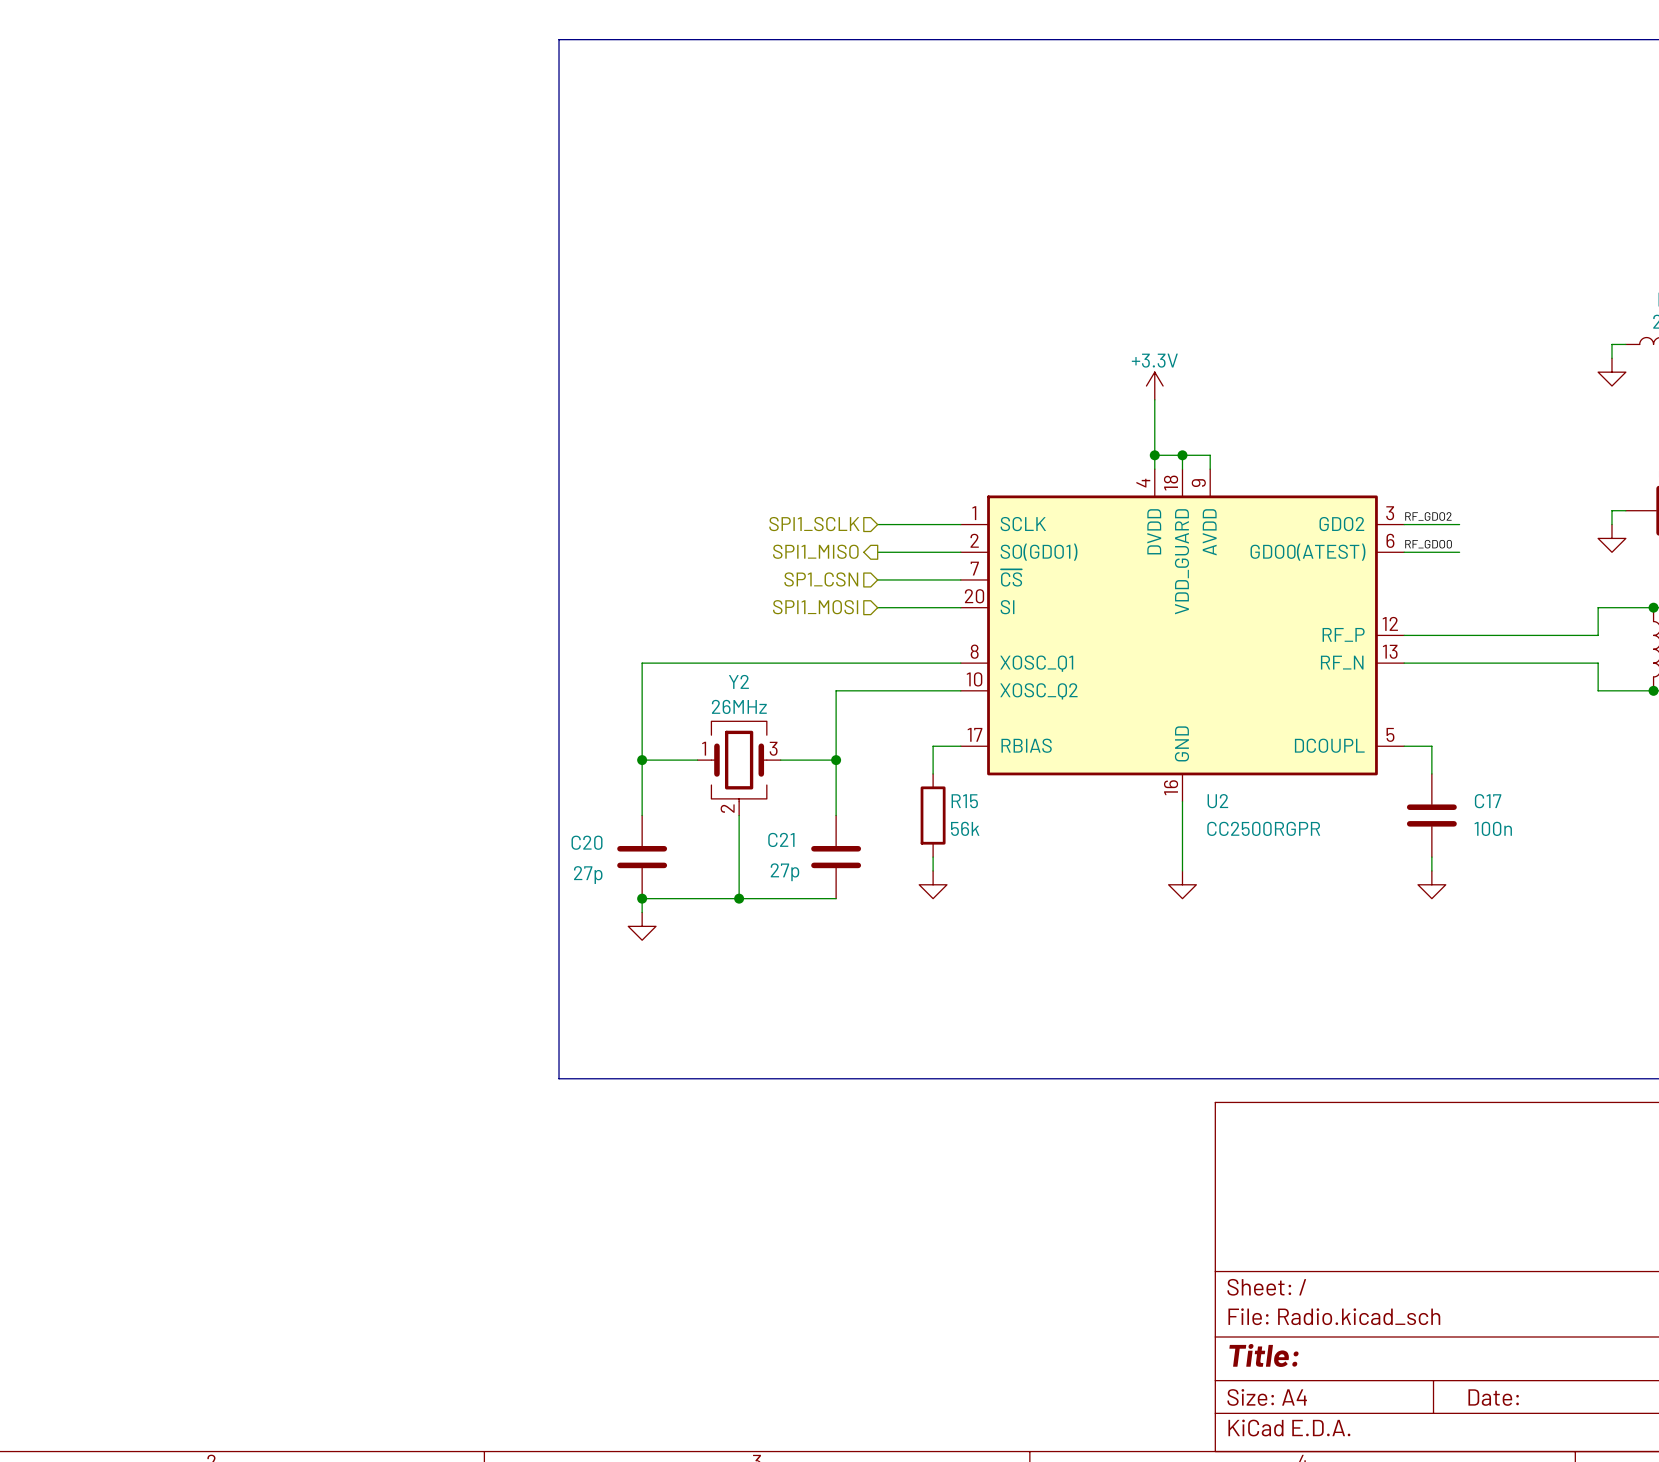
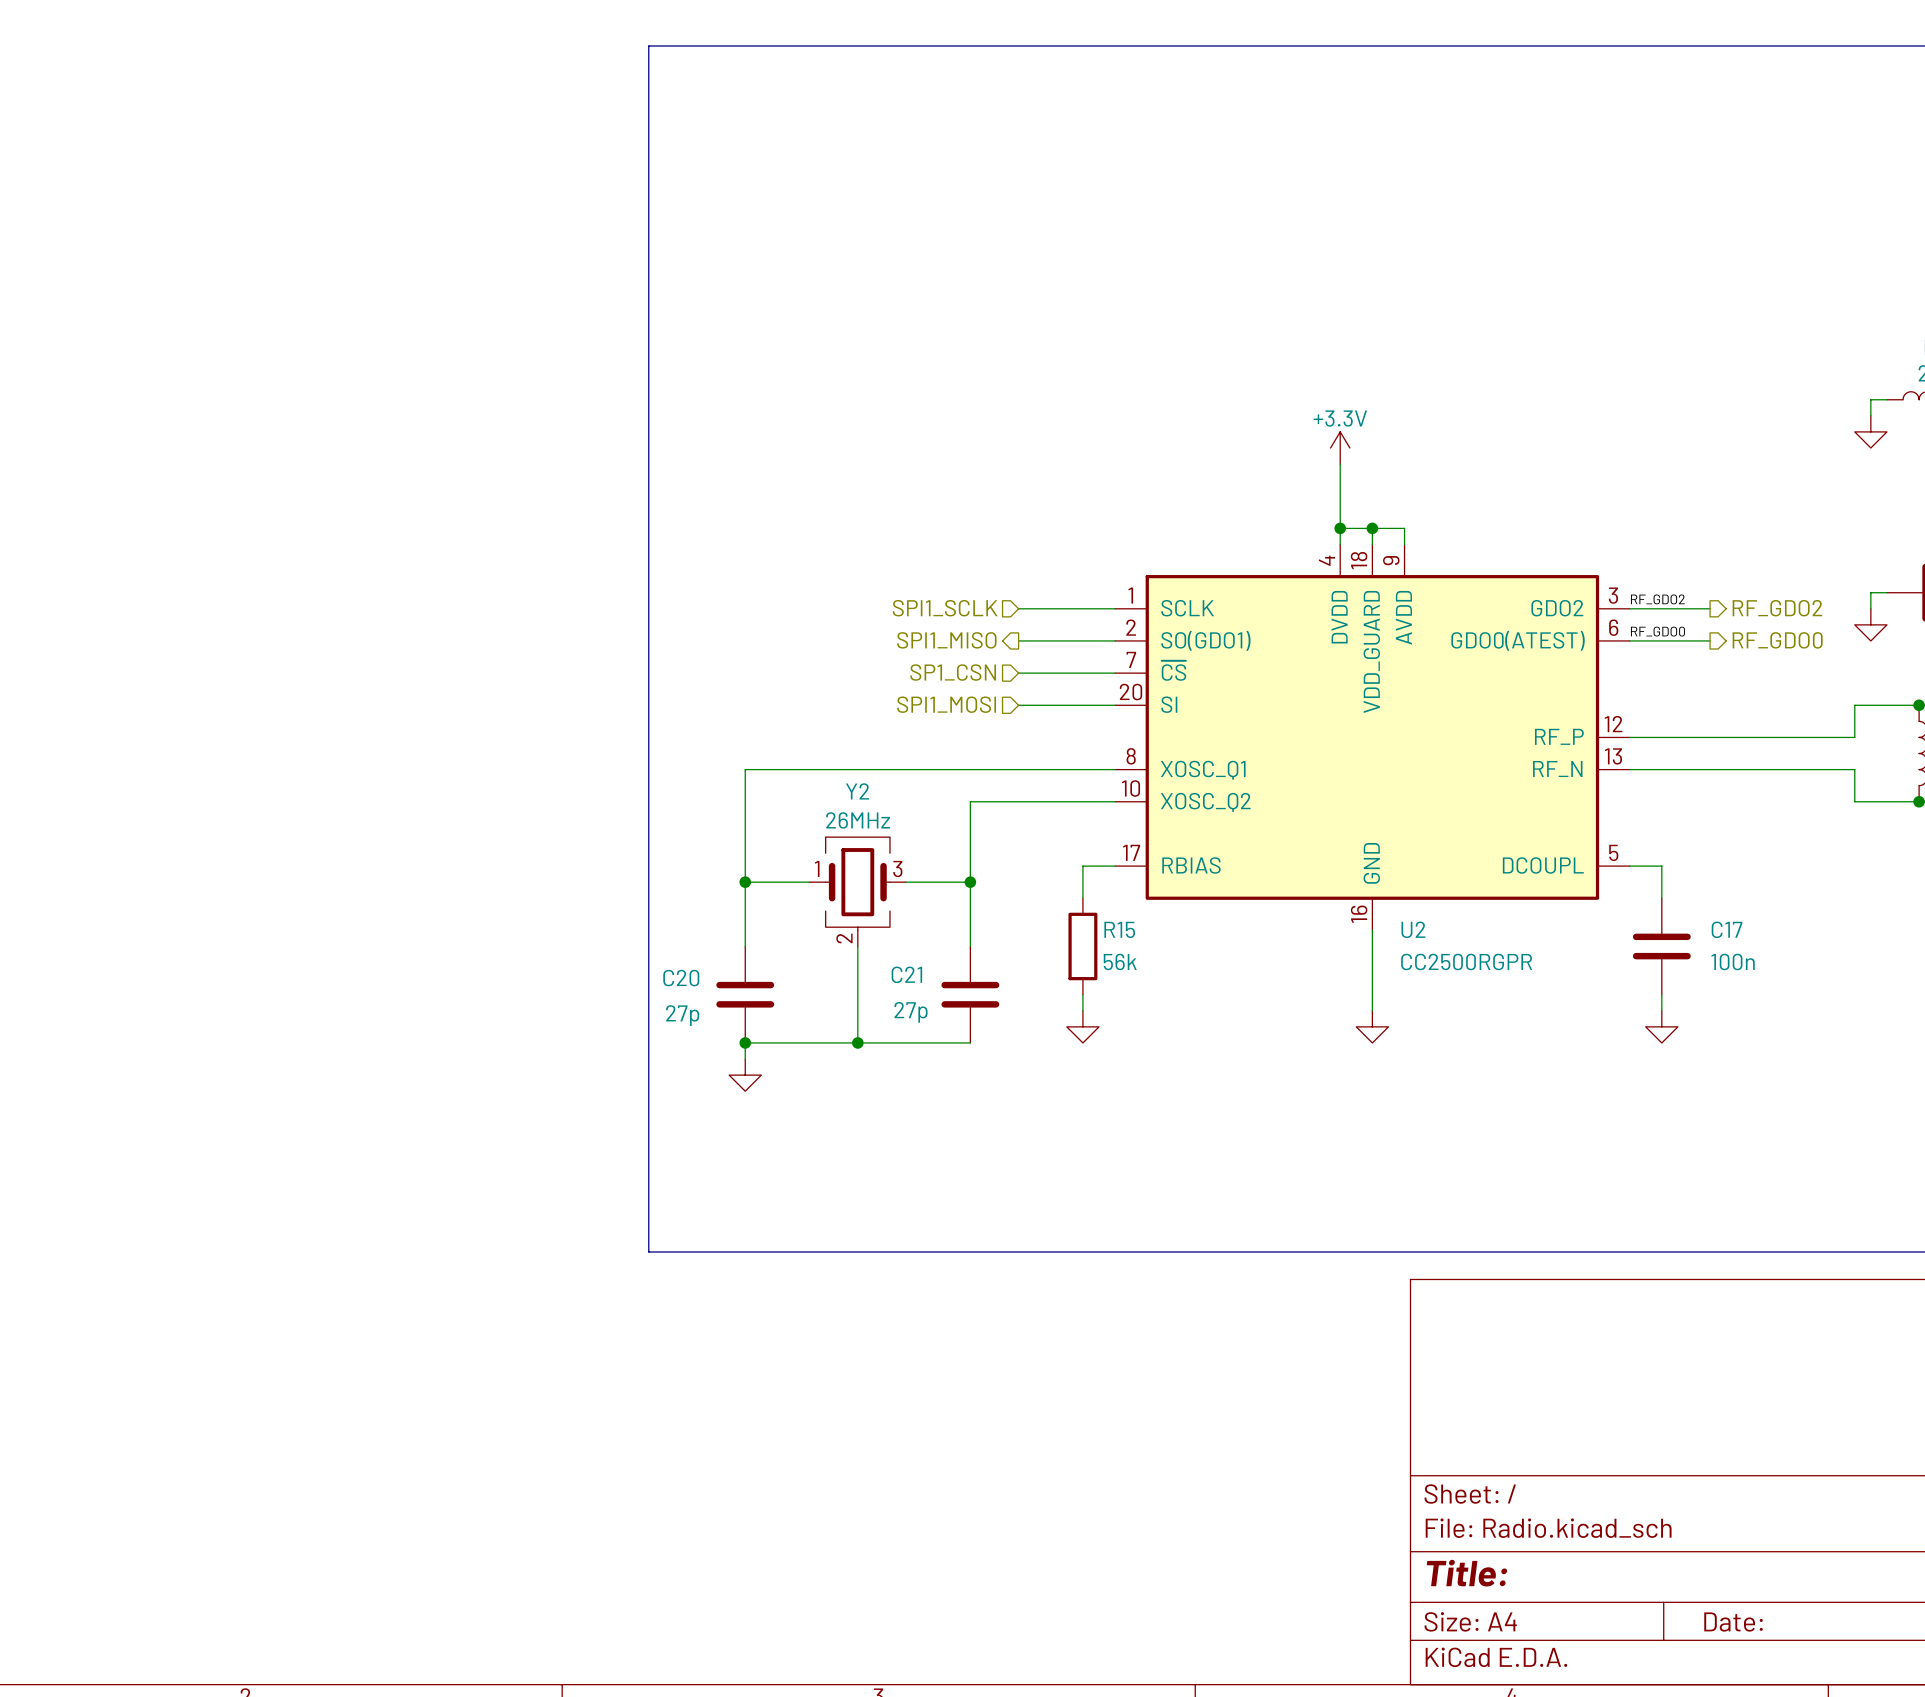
wire: none -> (1693, 608) (1710, 608)
hierarchical label: none -> RF_GDO2 (1777, 608)
hierarchical label: none -> RF_GDO0 (1777, 640)
wire: none -> (1693, 640) (1710, 640)

